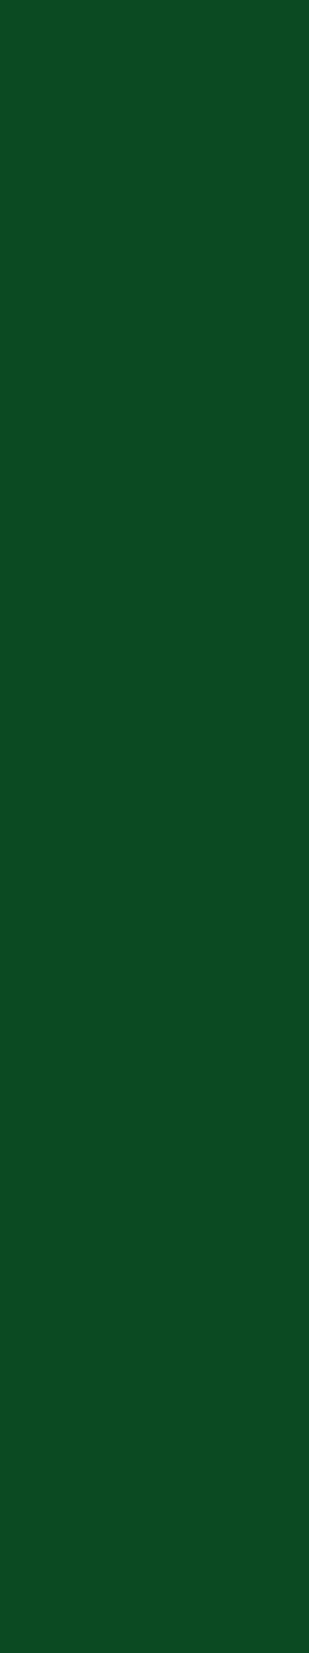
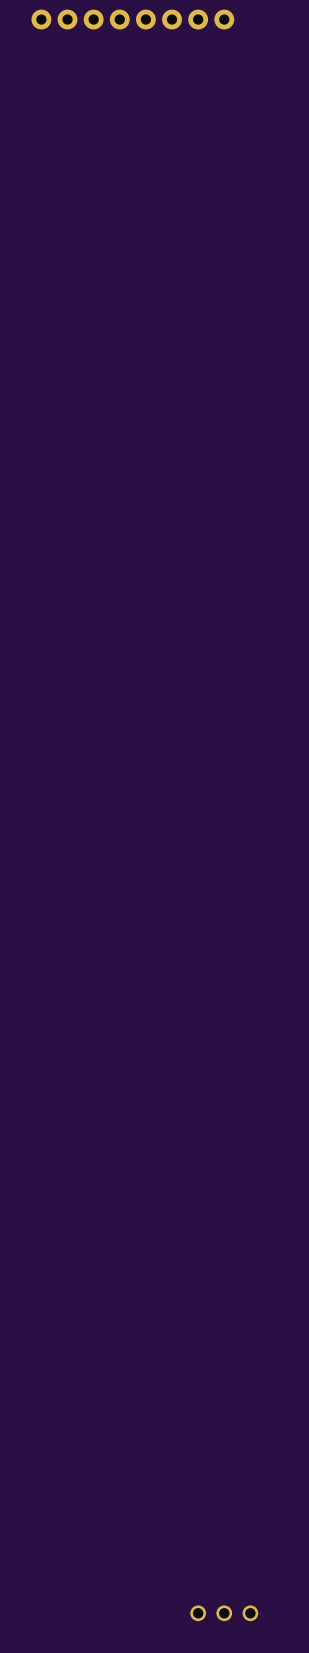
part: none -> (132, 19)
part: none -> (224, 1613)

